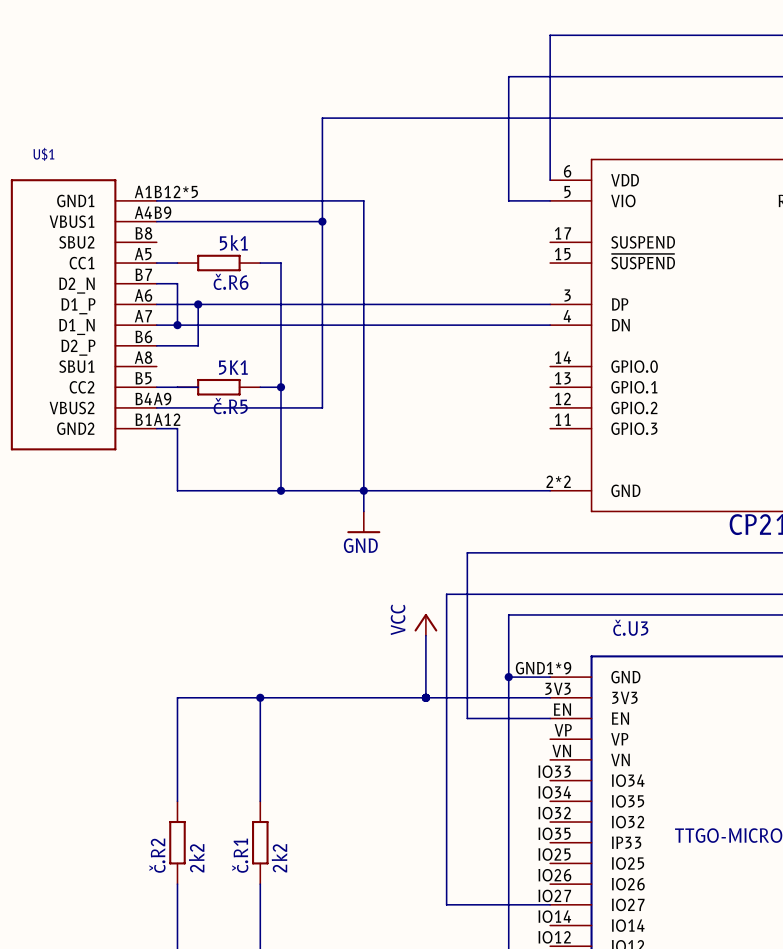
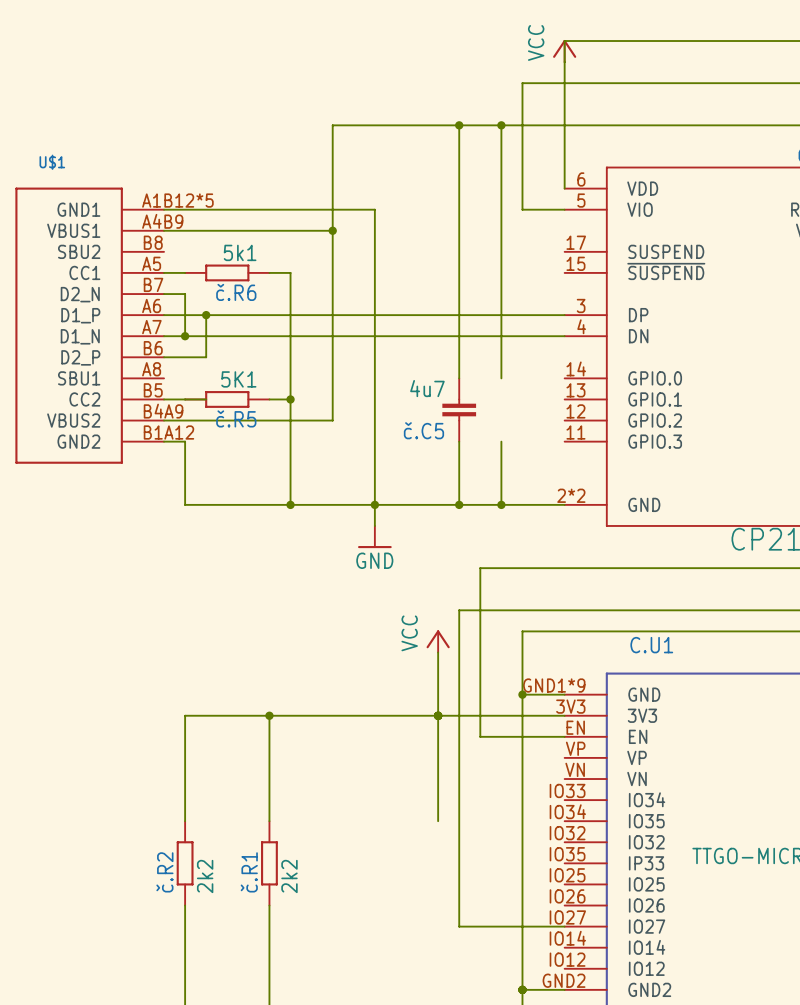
power symbol: none -> VCC (564, 51)
wire: none -> (459, 125) (459, 378)
junction: none -> (459, 125)
wire: none -> (501, 125) (501, 378)
junction: none -> (501, 125)
č.C5: none -> 4u7 (459, 410)
wire: none -> (459, 441) (459, 504)
wire: none -> (501, 441) (501, 504)
junction: none -> (459, 504)
junction: none -> (501, 504)
č.U3 name: č.U3 (630, 627) -> C.U1 (651, 645)
wire: none -> (438, 715) (438, 821)

